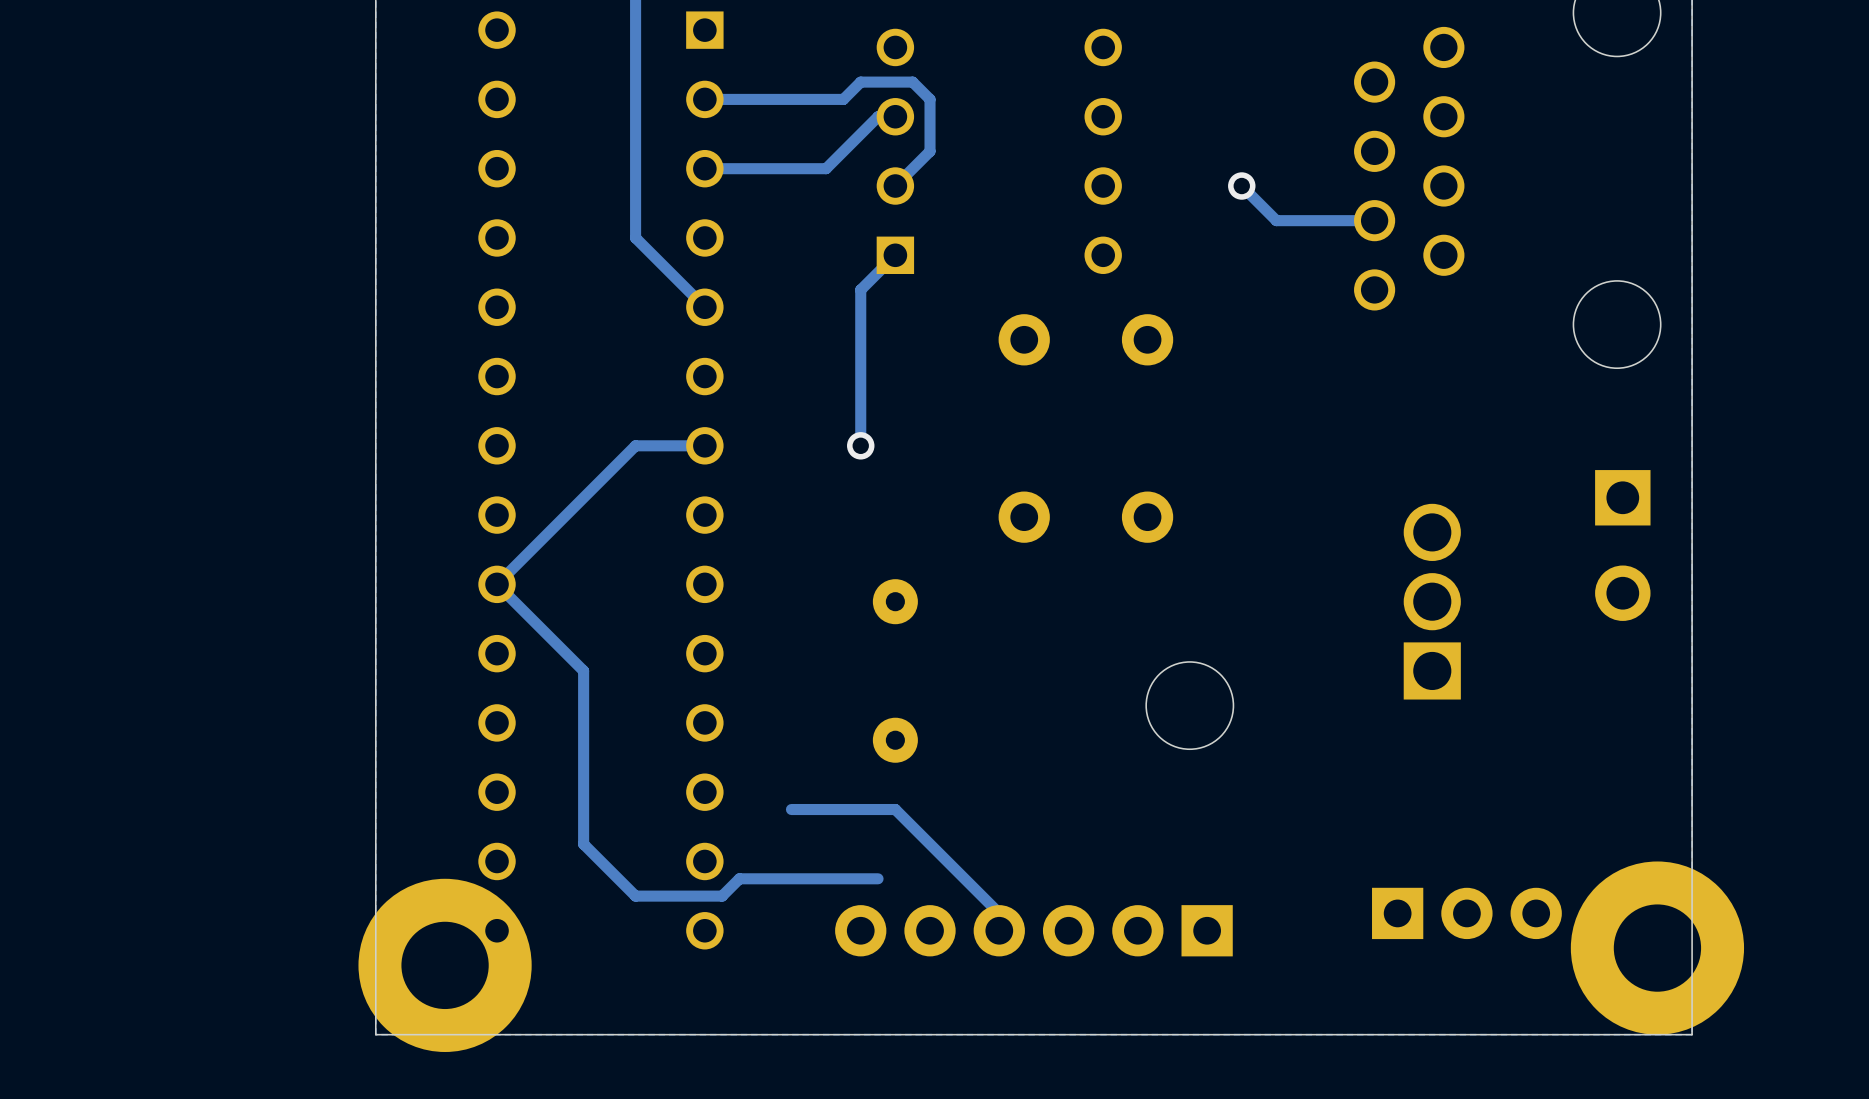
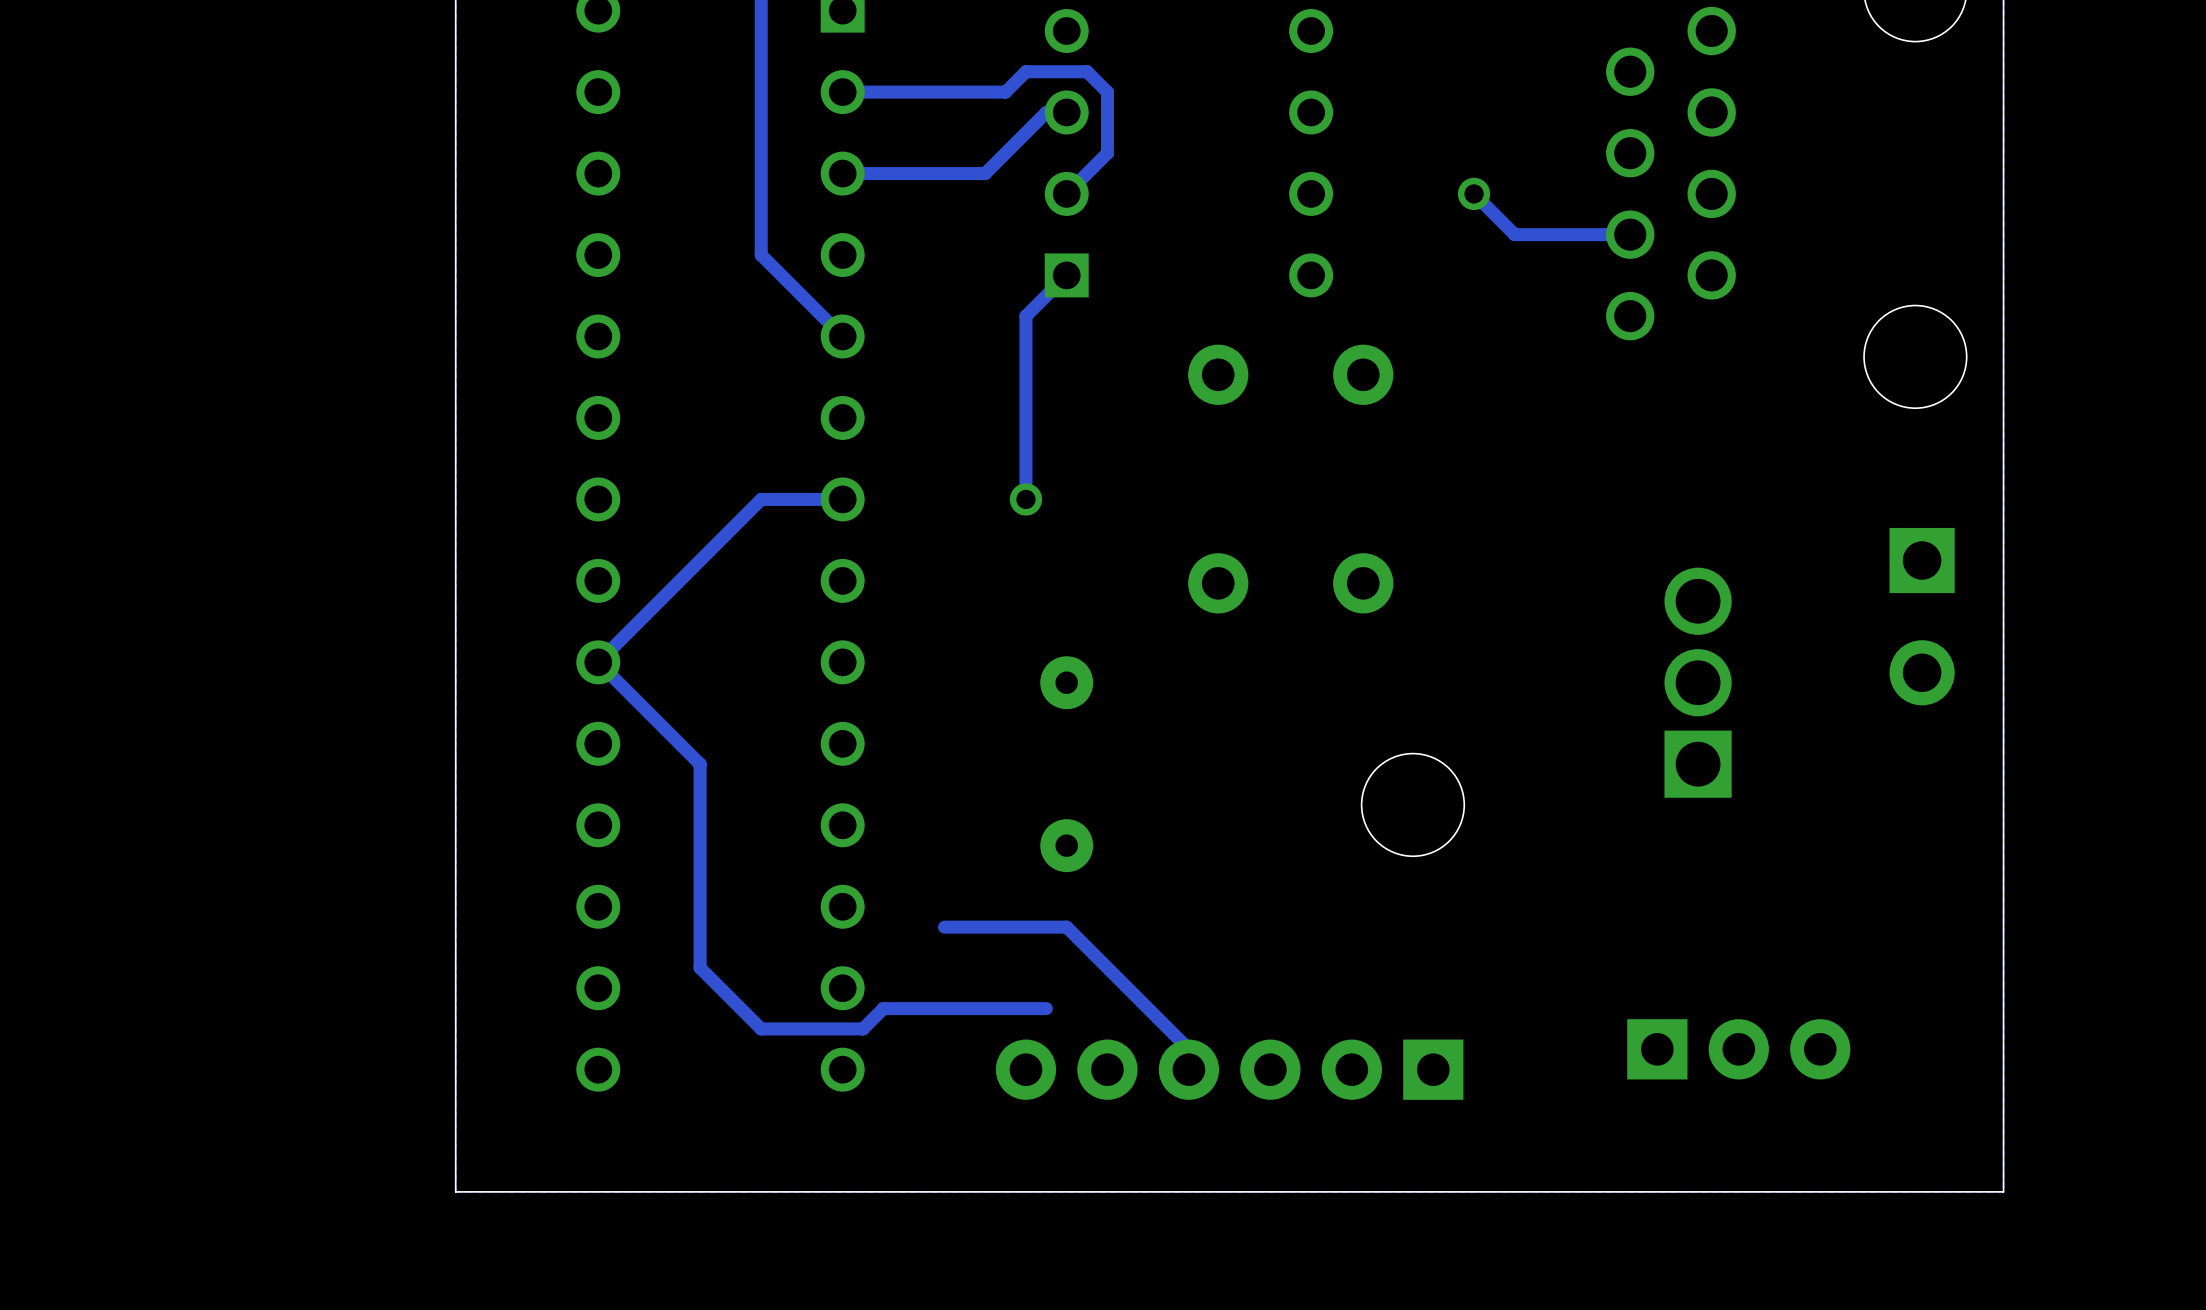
part: (1657, 948) -> none
part: (445, 965) -> none

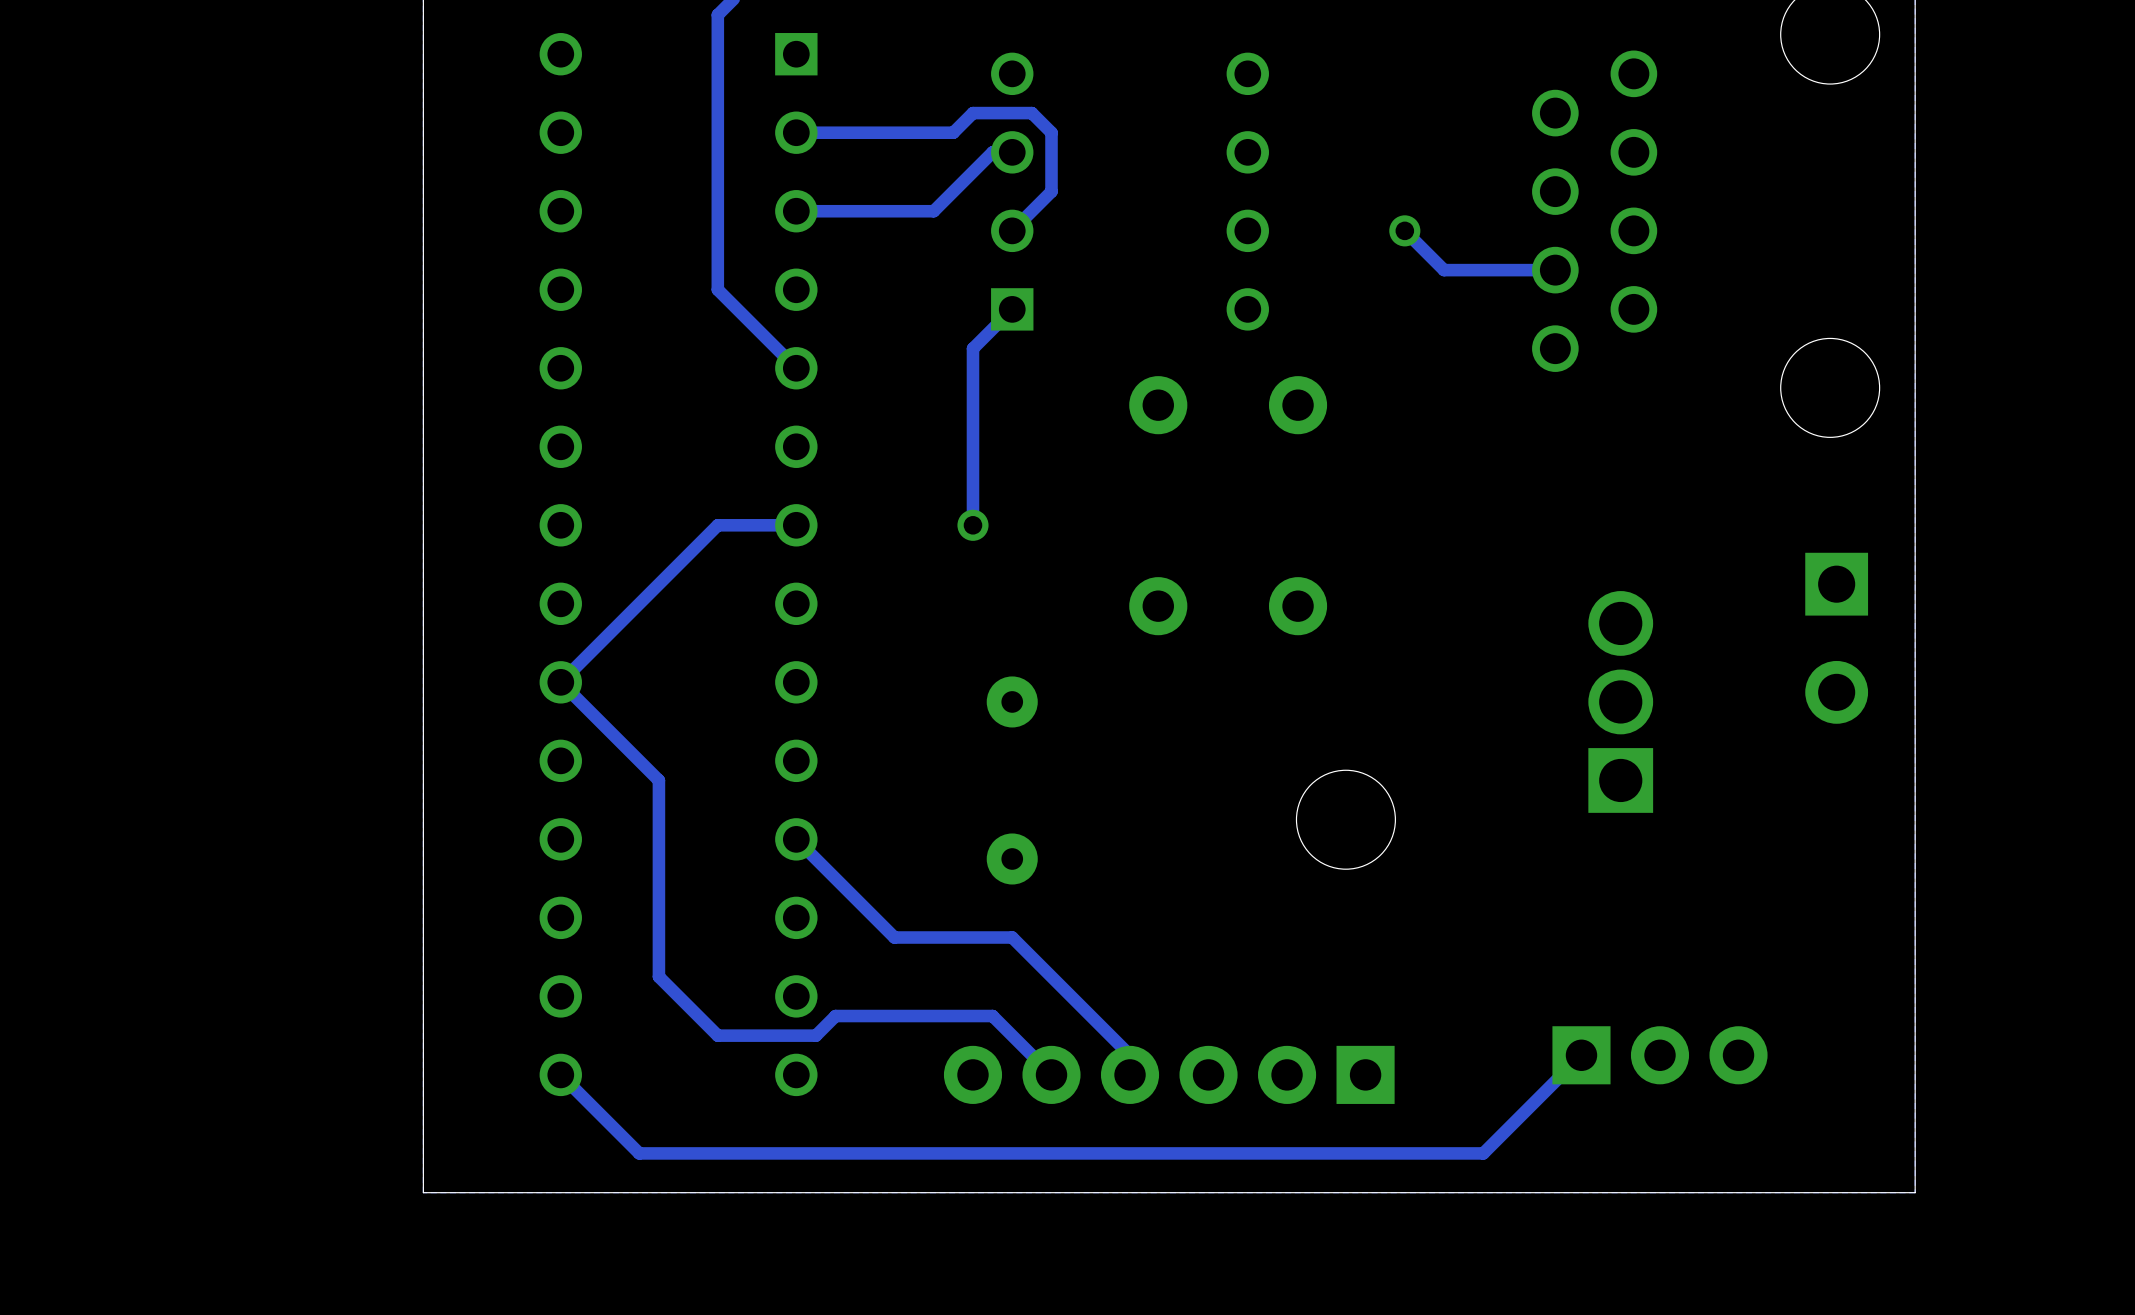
track: none -> (796, 839) (894, 937)
track: none -> (992, 1016) (1051, 1074)
track: none -> (1581, 1055) (1483, 1153) (639, 1153) (560, 1074)

